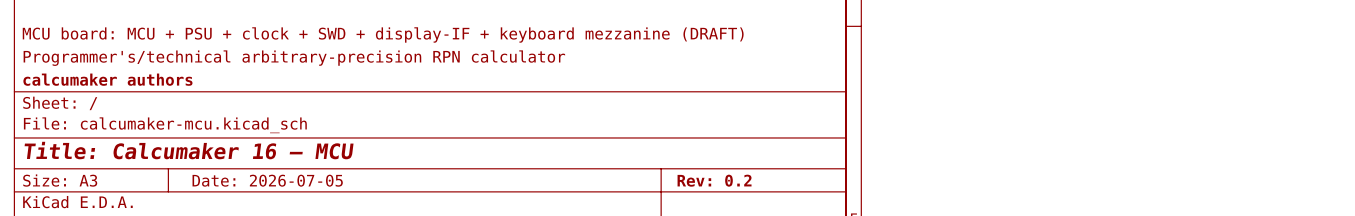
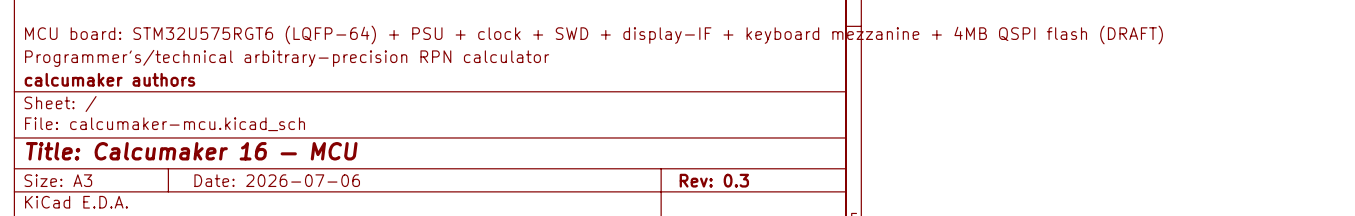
title block: MCU board: MCU + PSU + clock + SWD + display-IF + keyboard mezzanine (DRAFT) (383, 34) -> MCU board: STM32U575RGT6 (LQFP-64) + PSU + clock + SWD + display-IF + keyboard mezzanine + 4MB QSPI flash (DRAFT) (593, 34)
title block: Date: 2026-07-05 (267, 180) -> Date: 2026-07-06 (277, 180)
title block: Rev: 0.2 (714, 180) -> Rev: 0.3 (714, 180)

